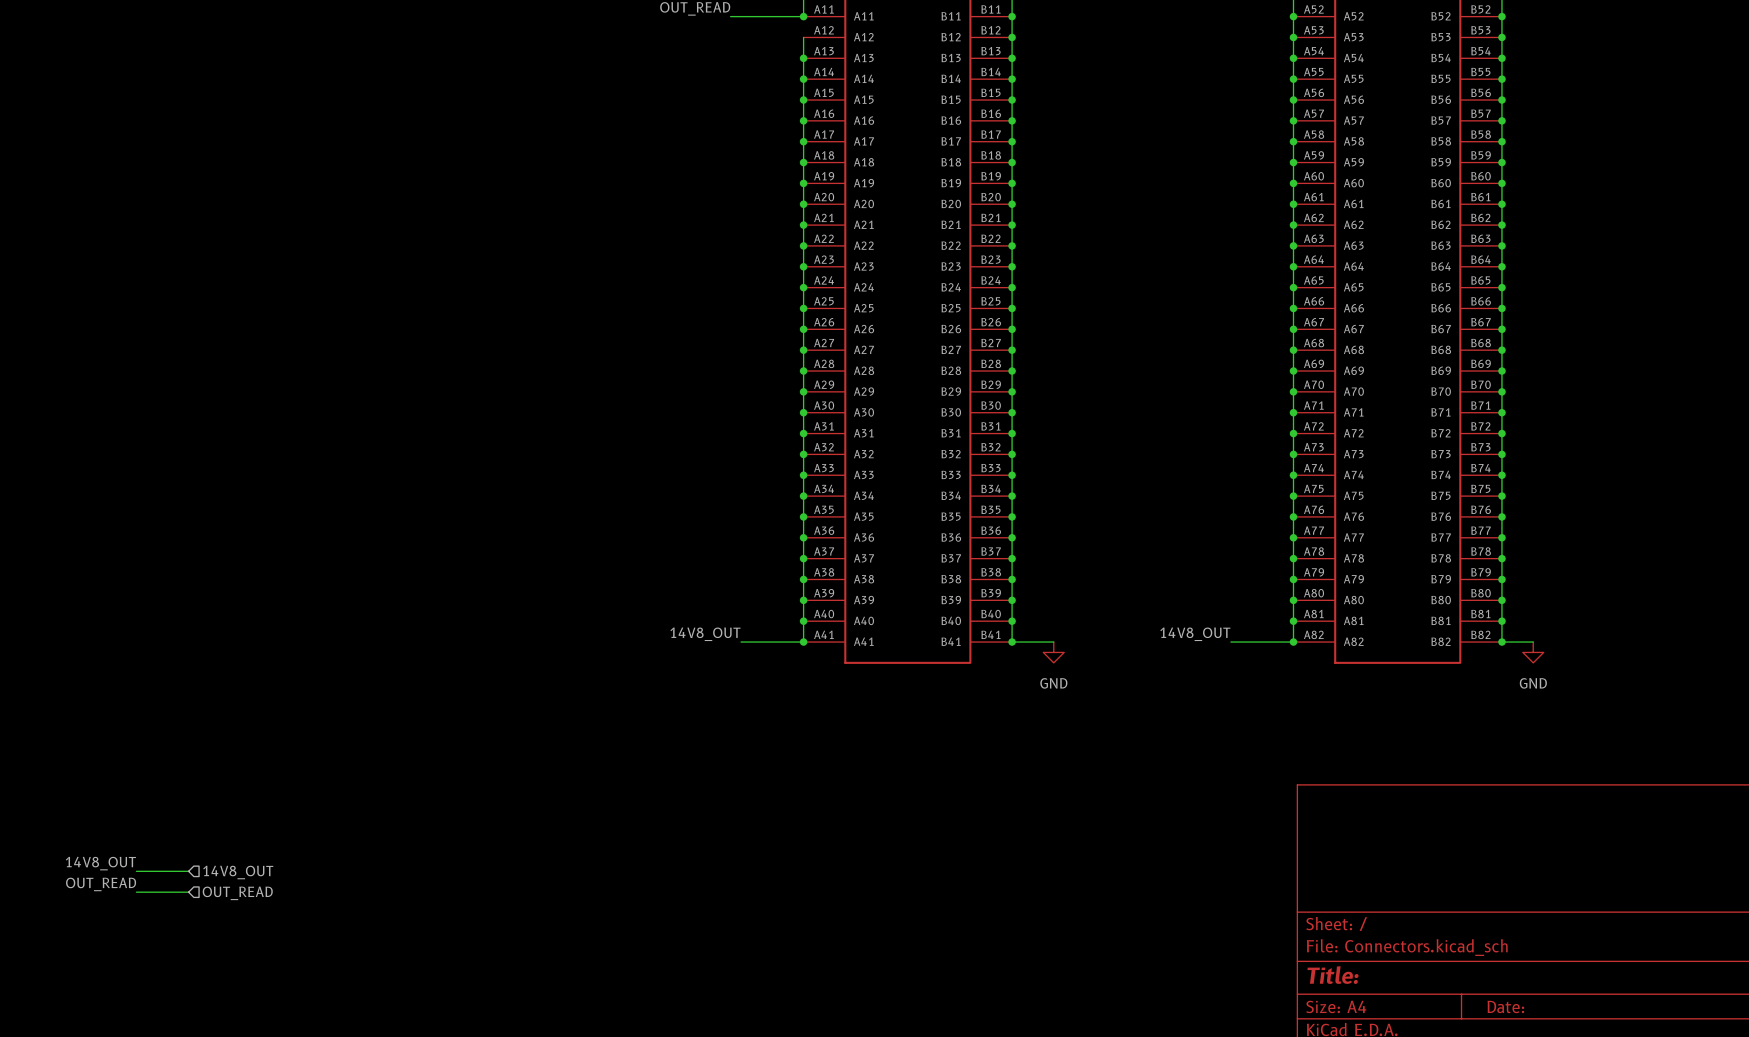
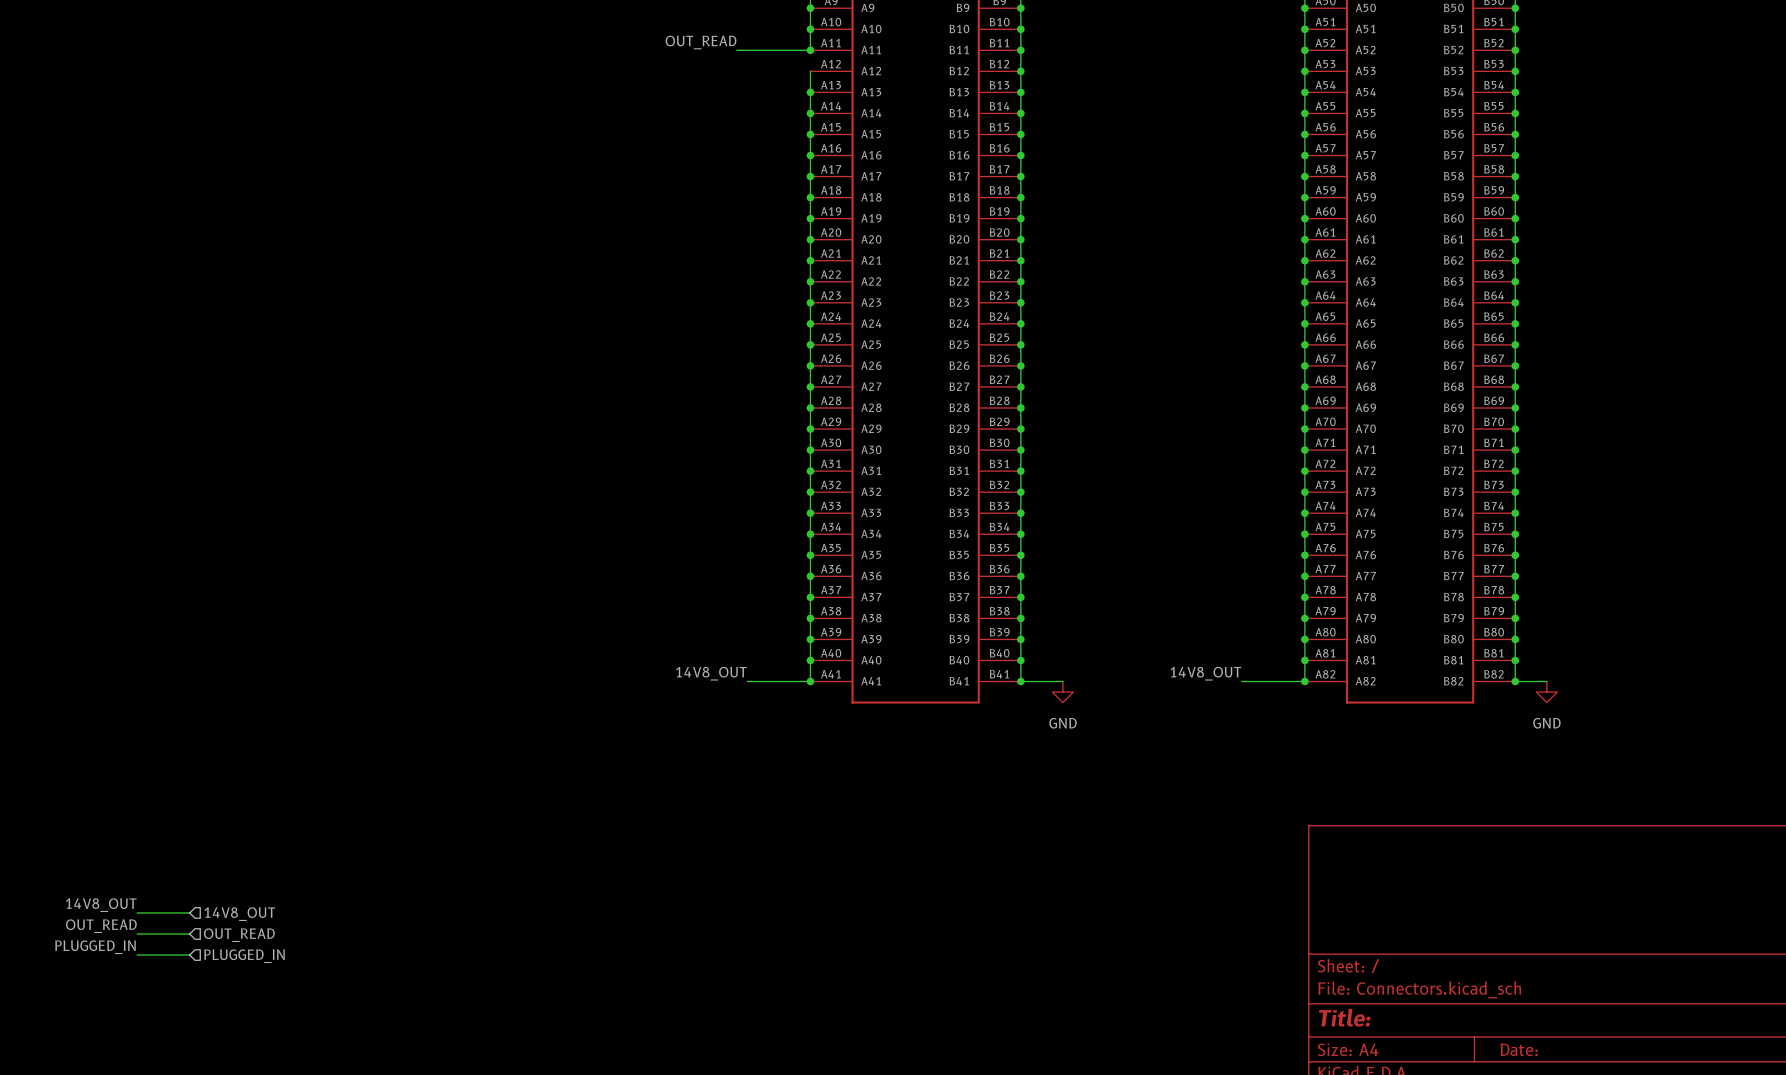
label: none -> PLUGGED_IN (95, 947)
wire: none -> (137, 955) (189, 955)
hierarchical label: none -> PLUGGED_IN (244, 956)

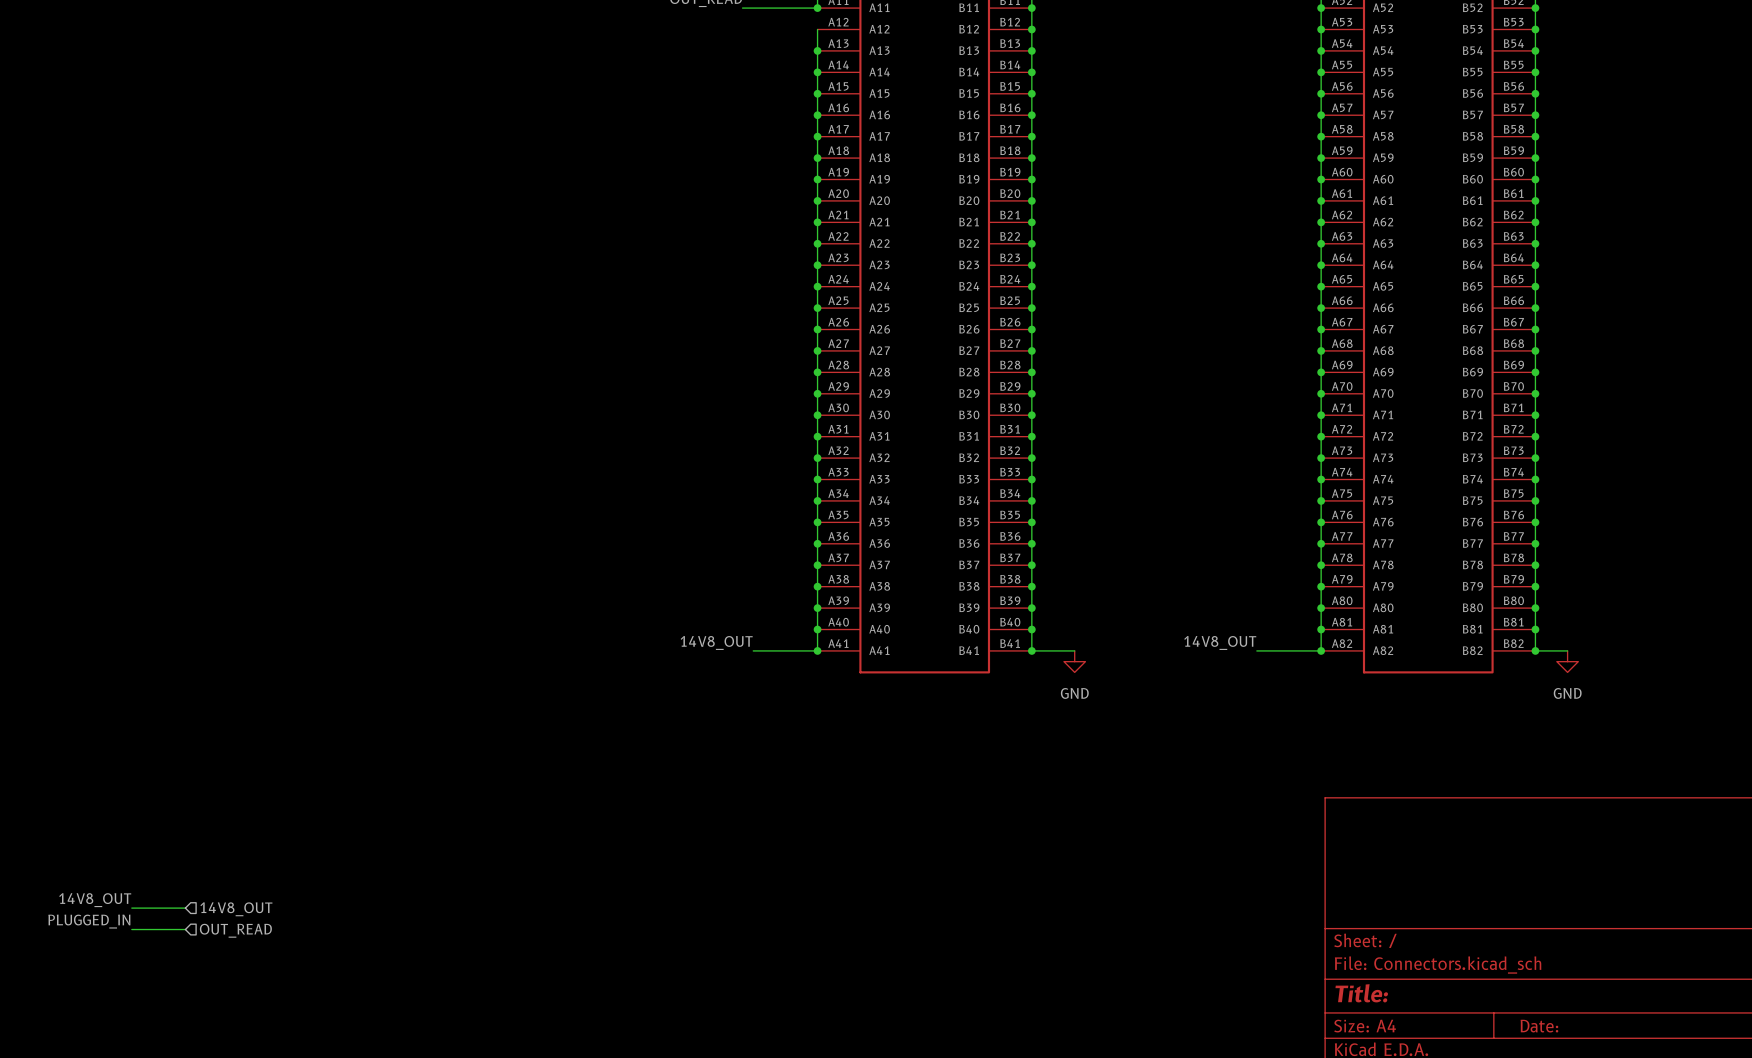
label: 14V8_OUT (101, 905) -> none
wire: (137, 912) (189, 912) -> none
hierarchical label: 14V8_OUT (239, 914) -> none
label: OUT_READ (101, 926) -> 14V8_OUT (95, 900)
hierarchical label: OUT_READ (239, 935) -> 14V8_OUT (236, 909)
hierarchical label: PLUGGED_IN (244, 956) -> OUT_READ (235, 930)

